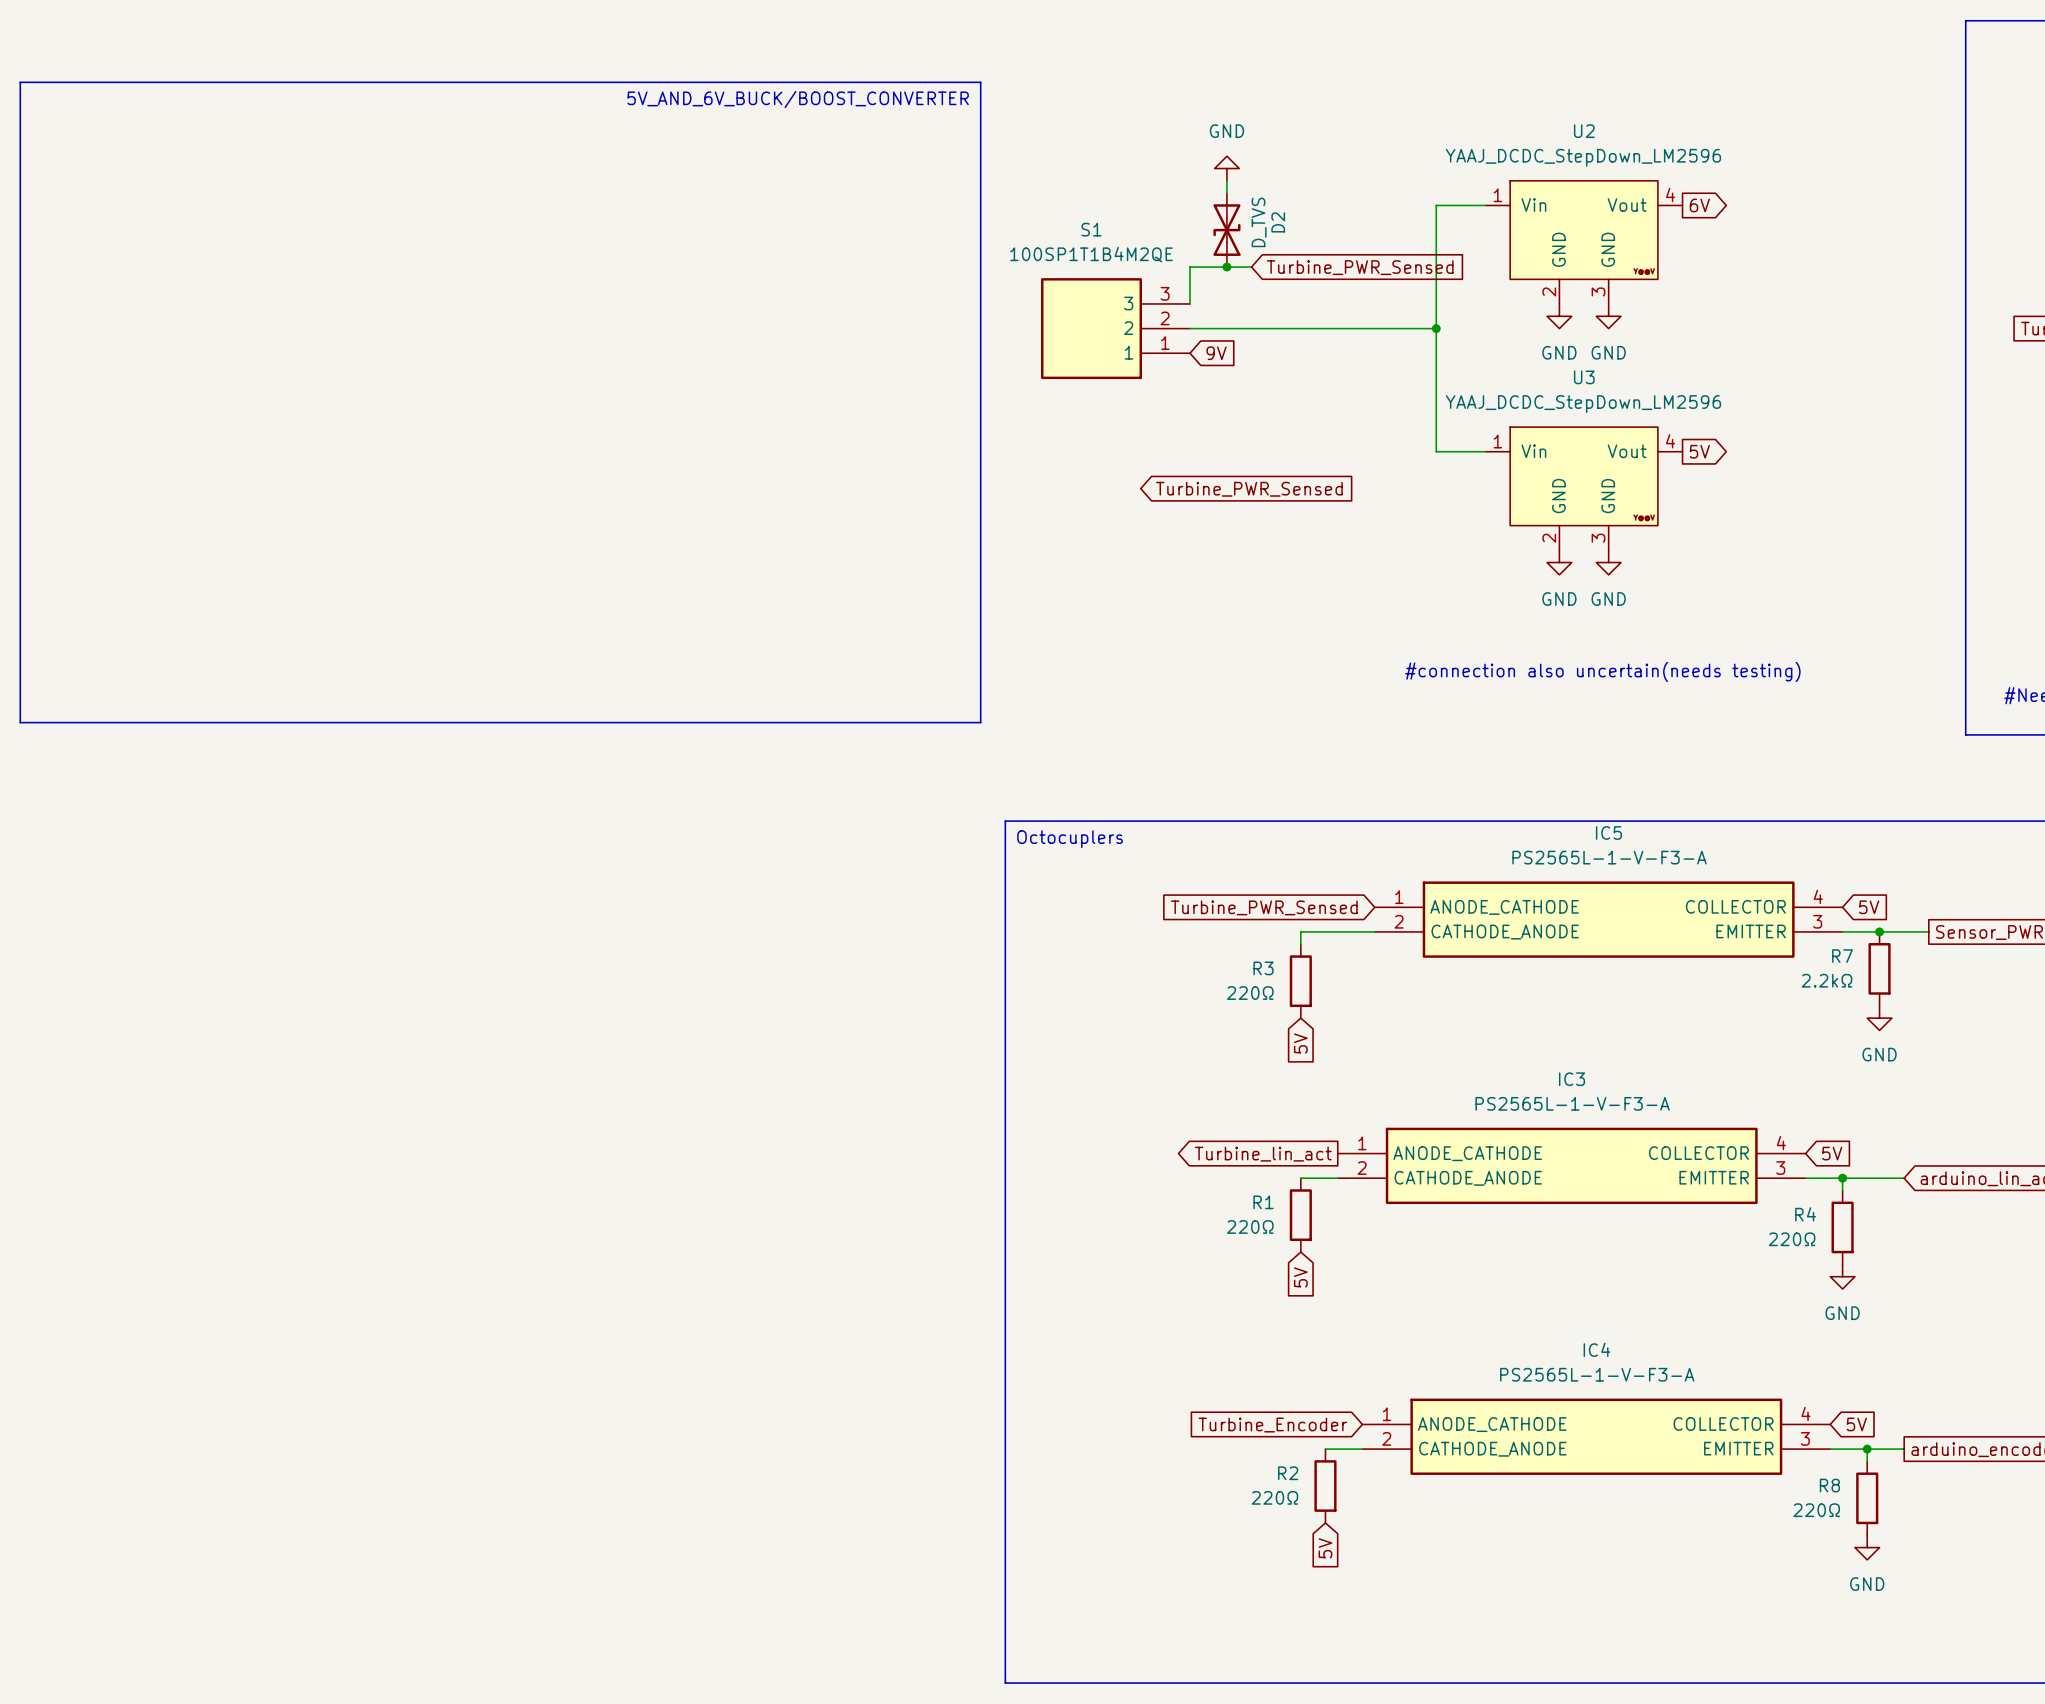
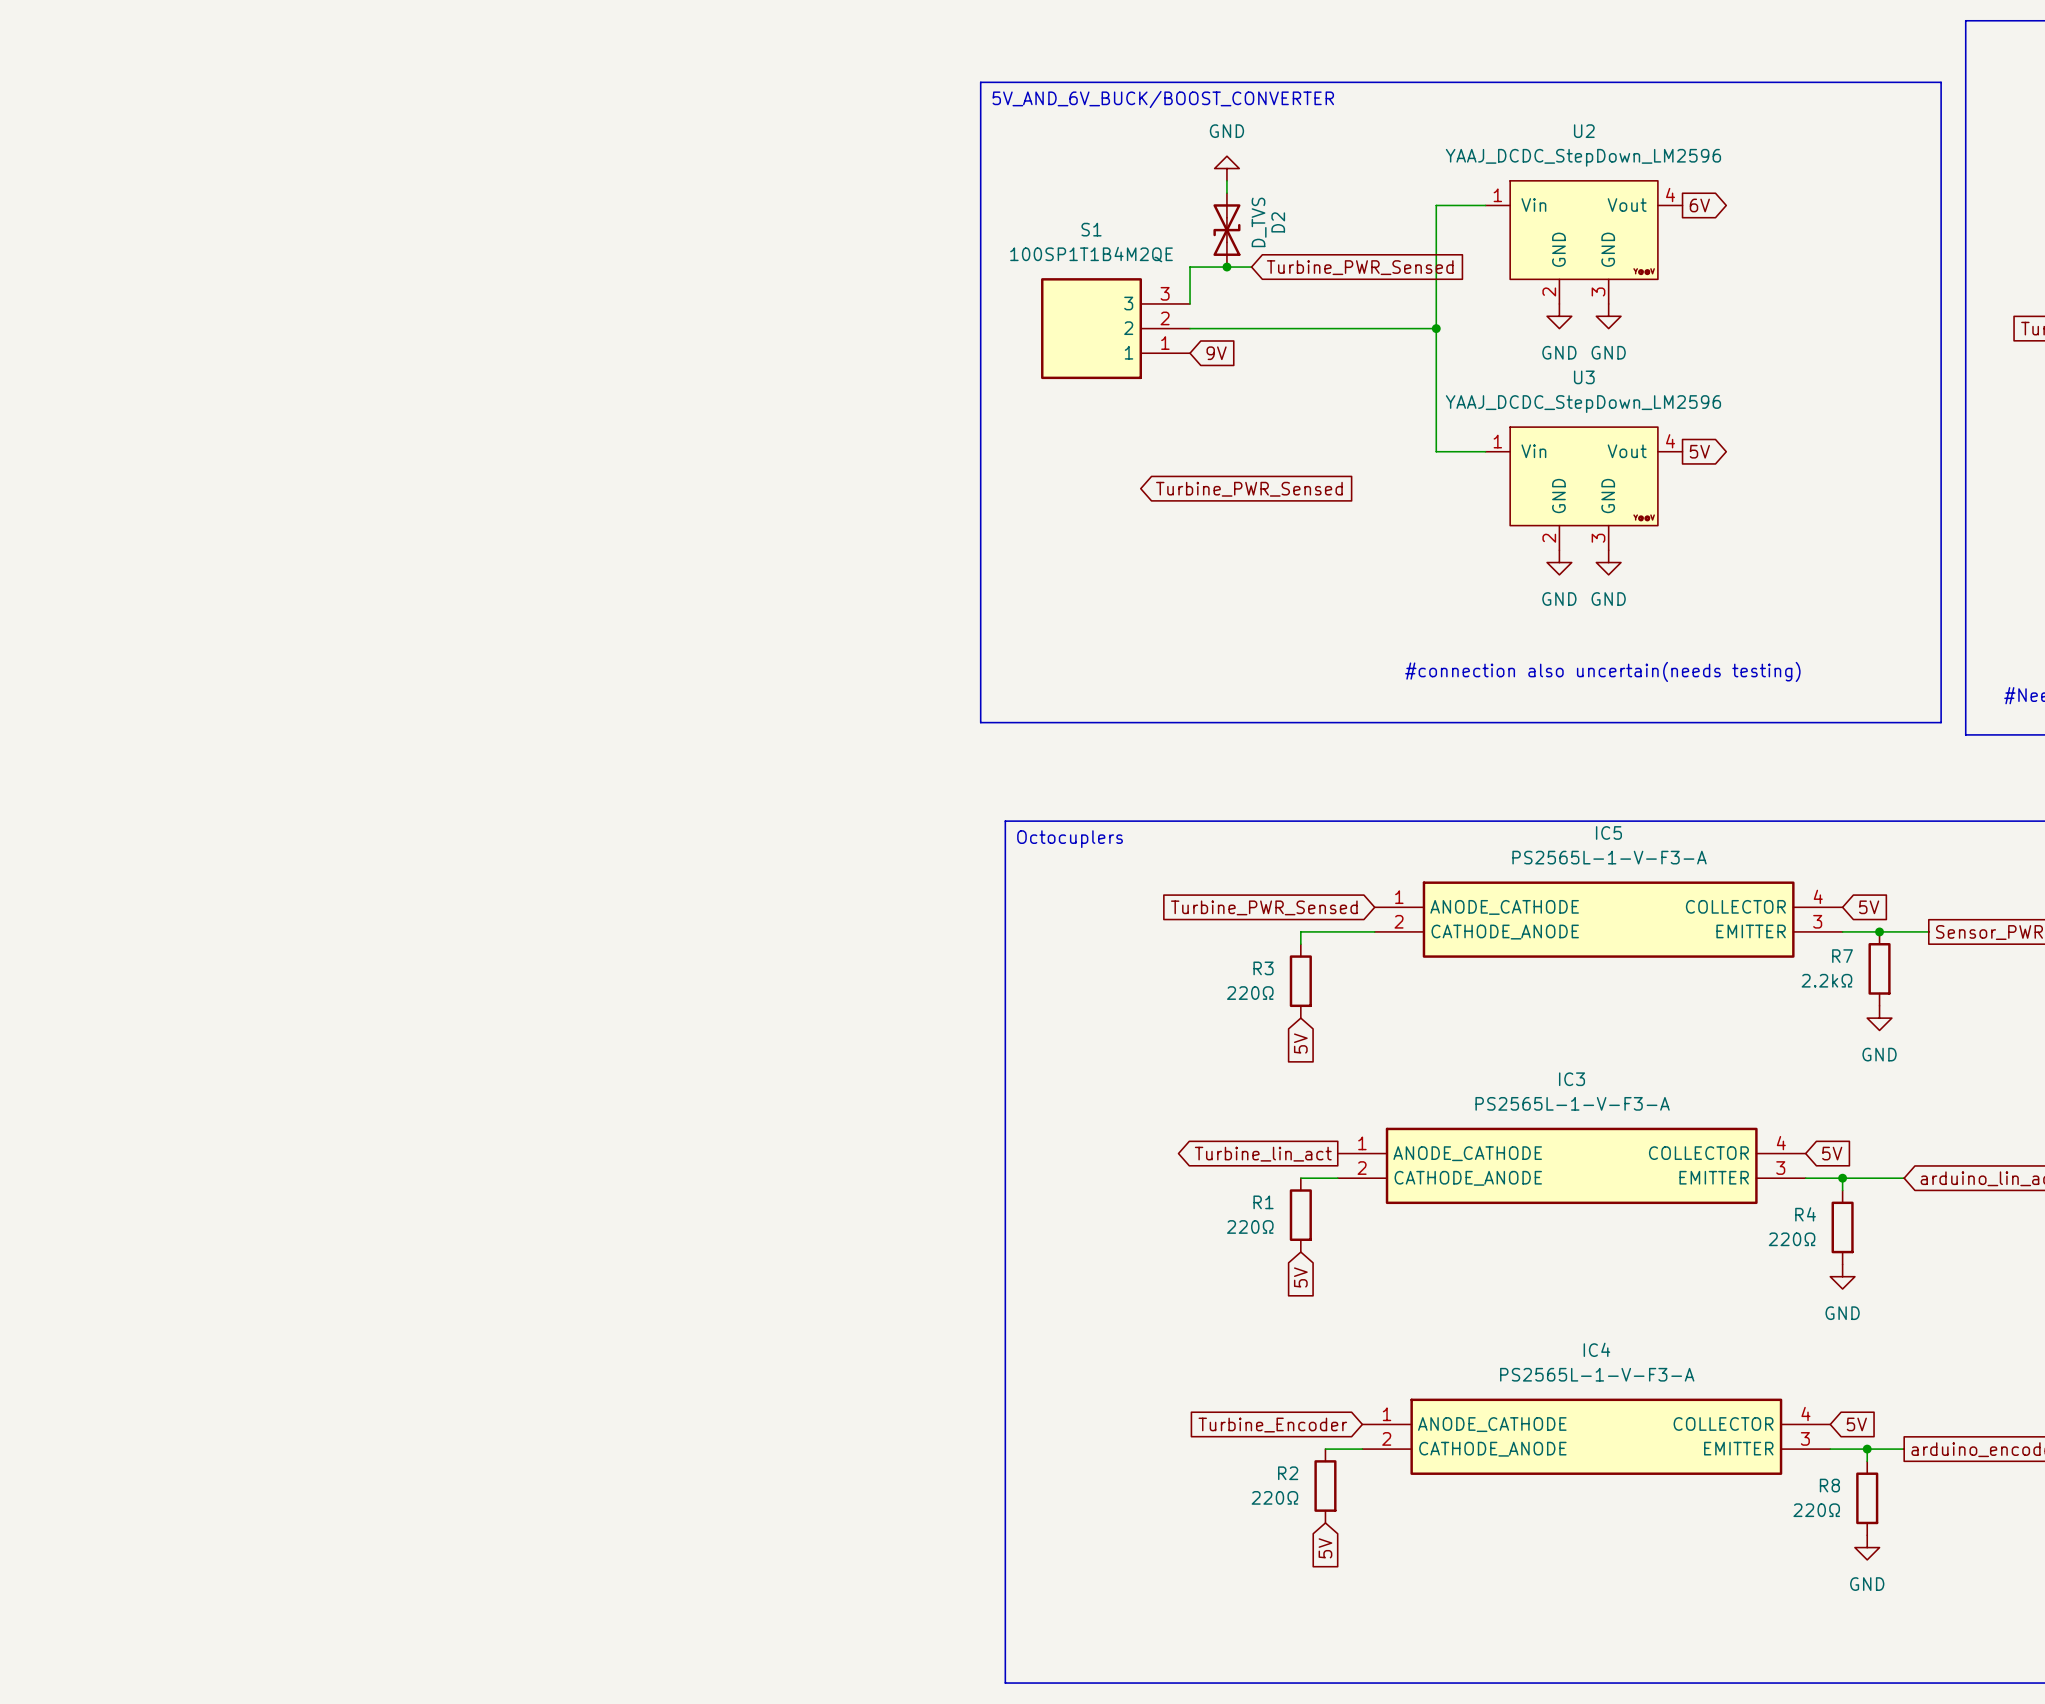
line: (980, 82) (20, 82) (20, 722) (980, 722) -> (980, 82) (1941, 82) (1941, 722) (980, 722)
text position: 5V_AND_6V_BUCK/BOOST_CONVERTER (798, 99) -> 5V_AND_6V_BUCK/BOOST_CONVERTER (1163, 99)

